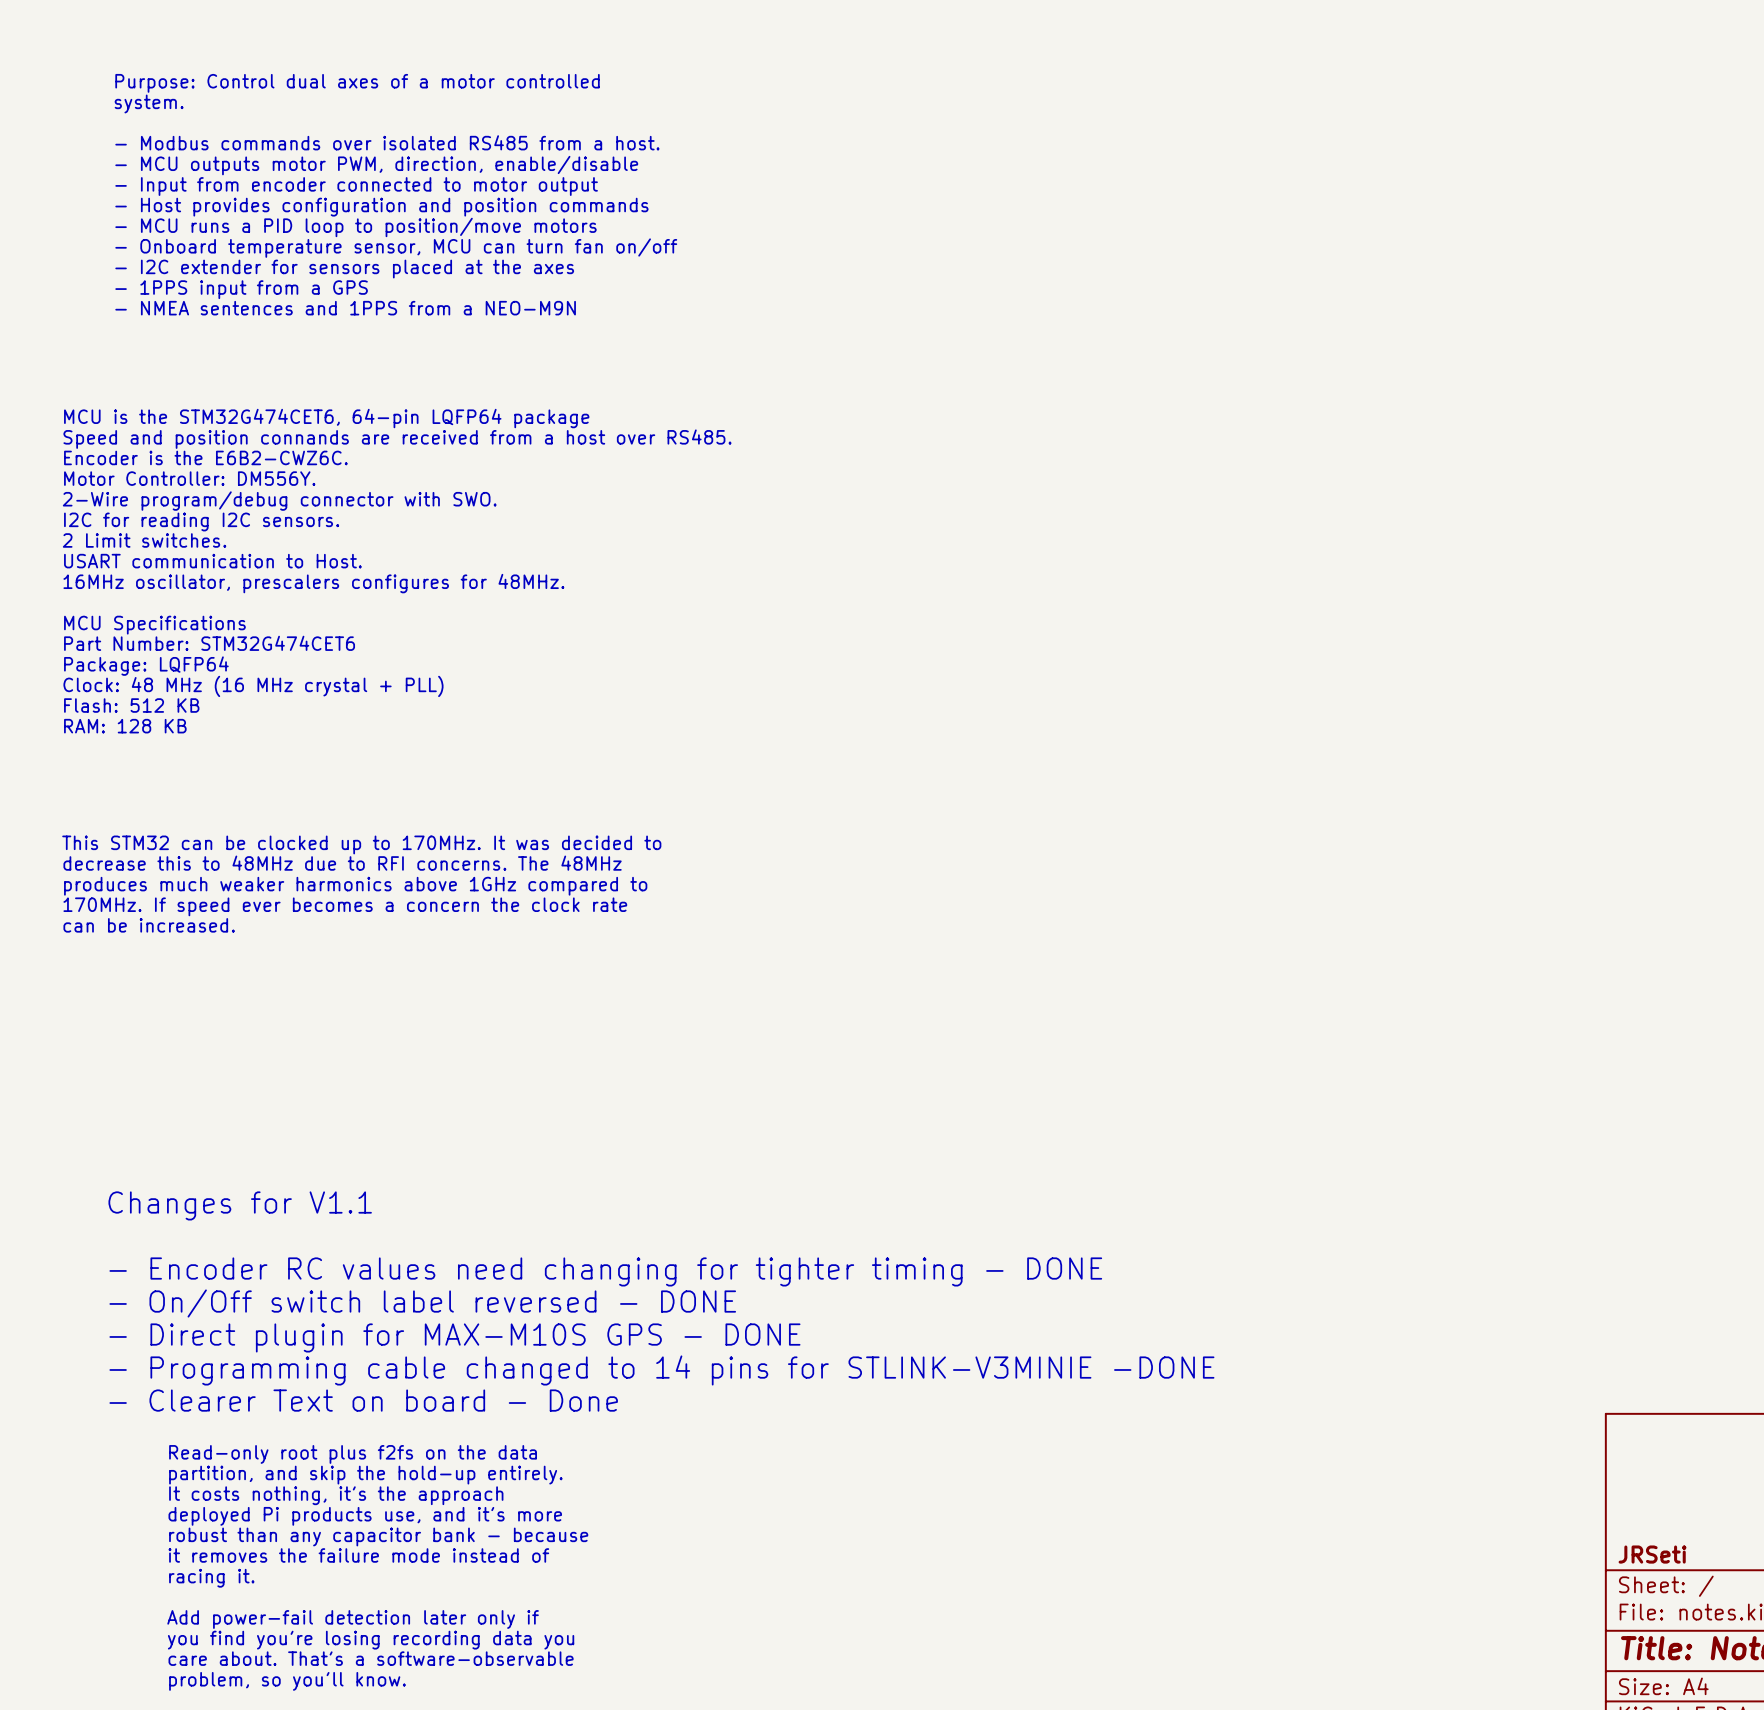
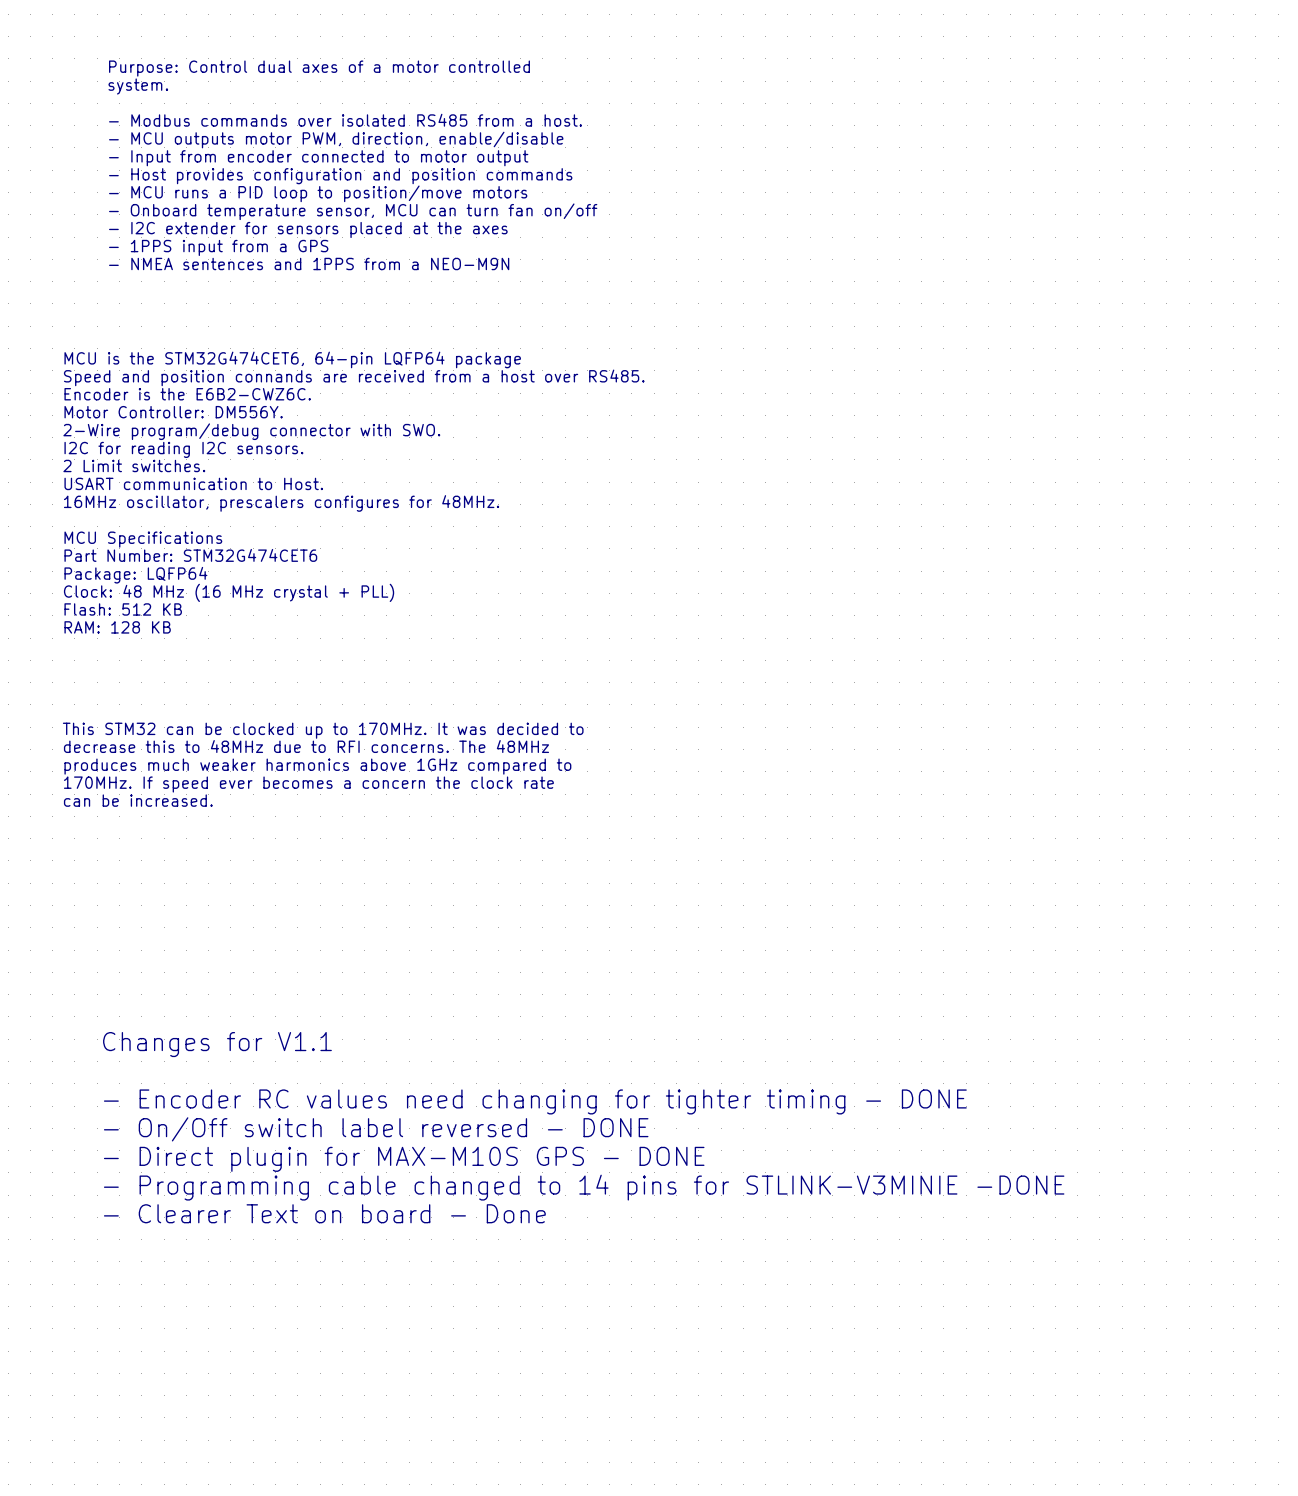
text: Read-only root plus f2fs on the data (353, 1454) -> none
text: partition, and skip the hold-up entirely. (365, 1475) -> none
text: It costs nothing, it's the approach (336, 1495) -> none
text: deployed Pi products use, and it's more (365, 1516) -> none
text: robust than any capacitor bank - because (378, 1536) -> none
text: it removes the failure mode instead of (358, 1555) -> none
text: racing it. (211, 1578) -> none
text: Add power-fail detection later only if (353, 1619) -> none
text: you find you're losing recording data you (371, 1640) -> none
text: care about. That's a software-observable (371, 1658) -> none
text: problem, so you'll know. (287, 1681) -> none

